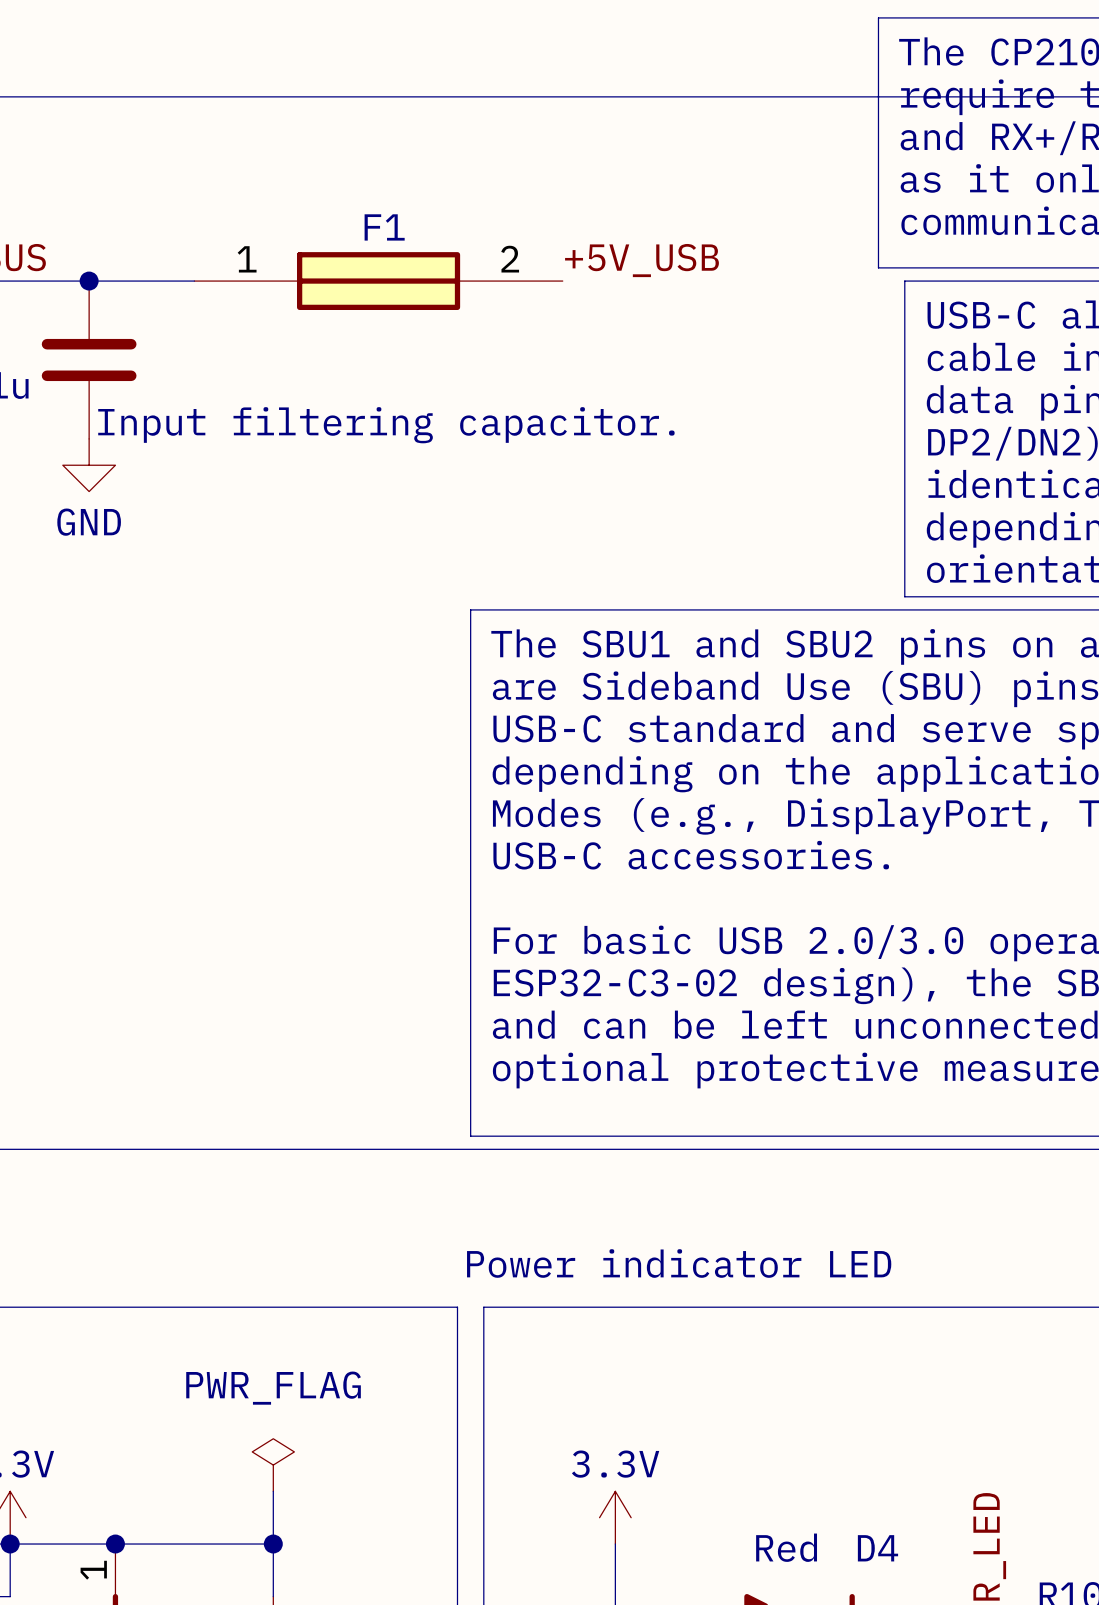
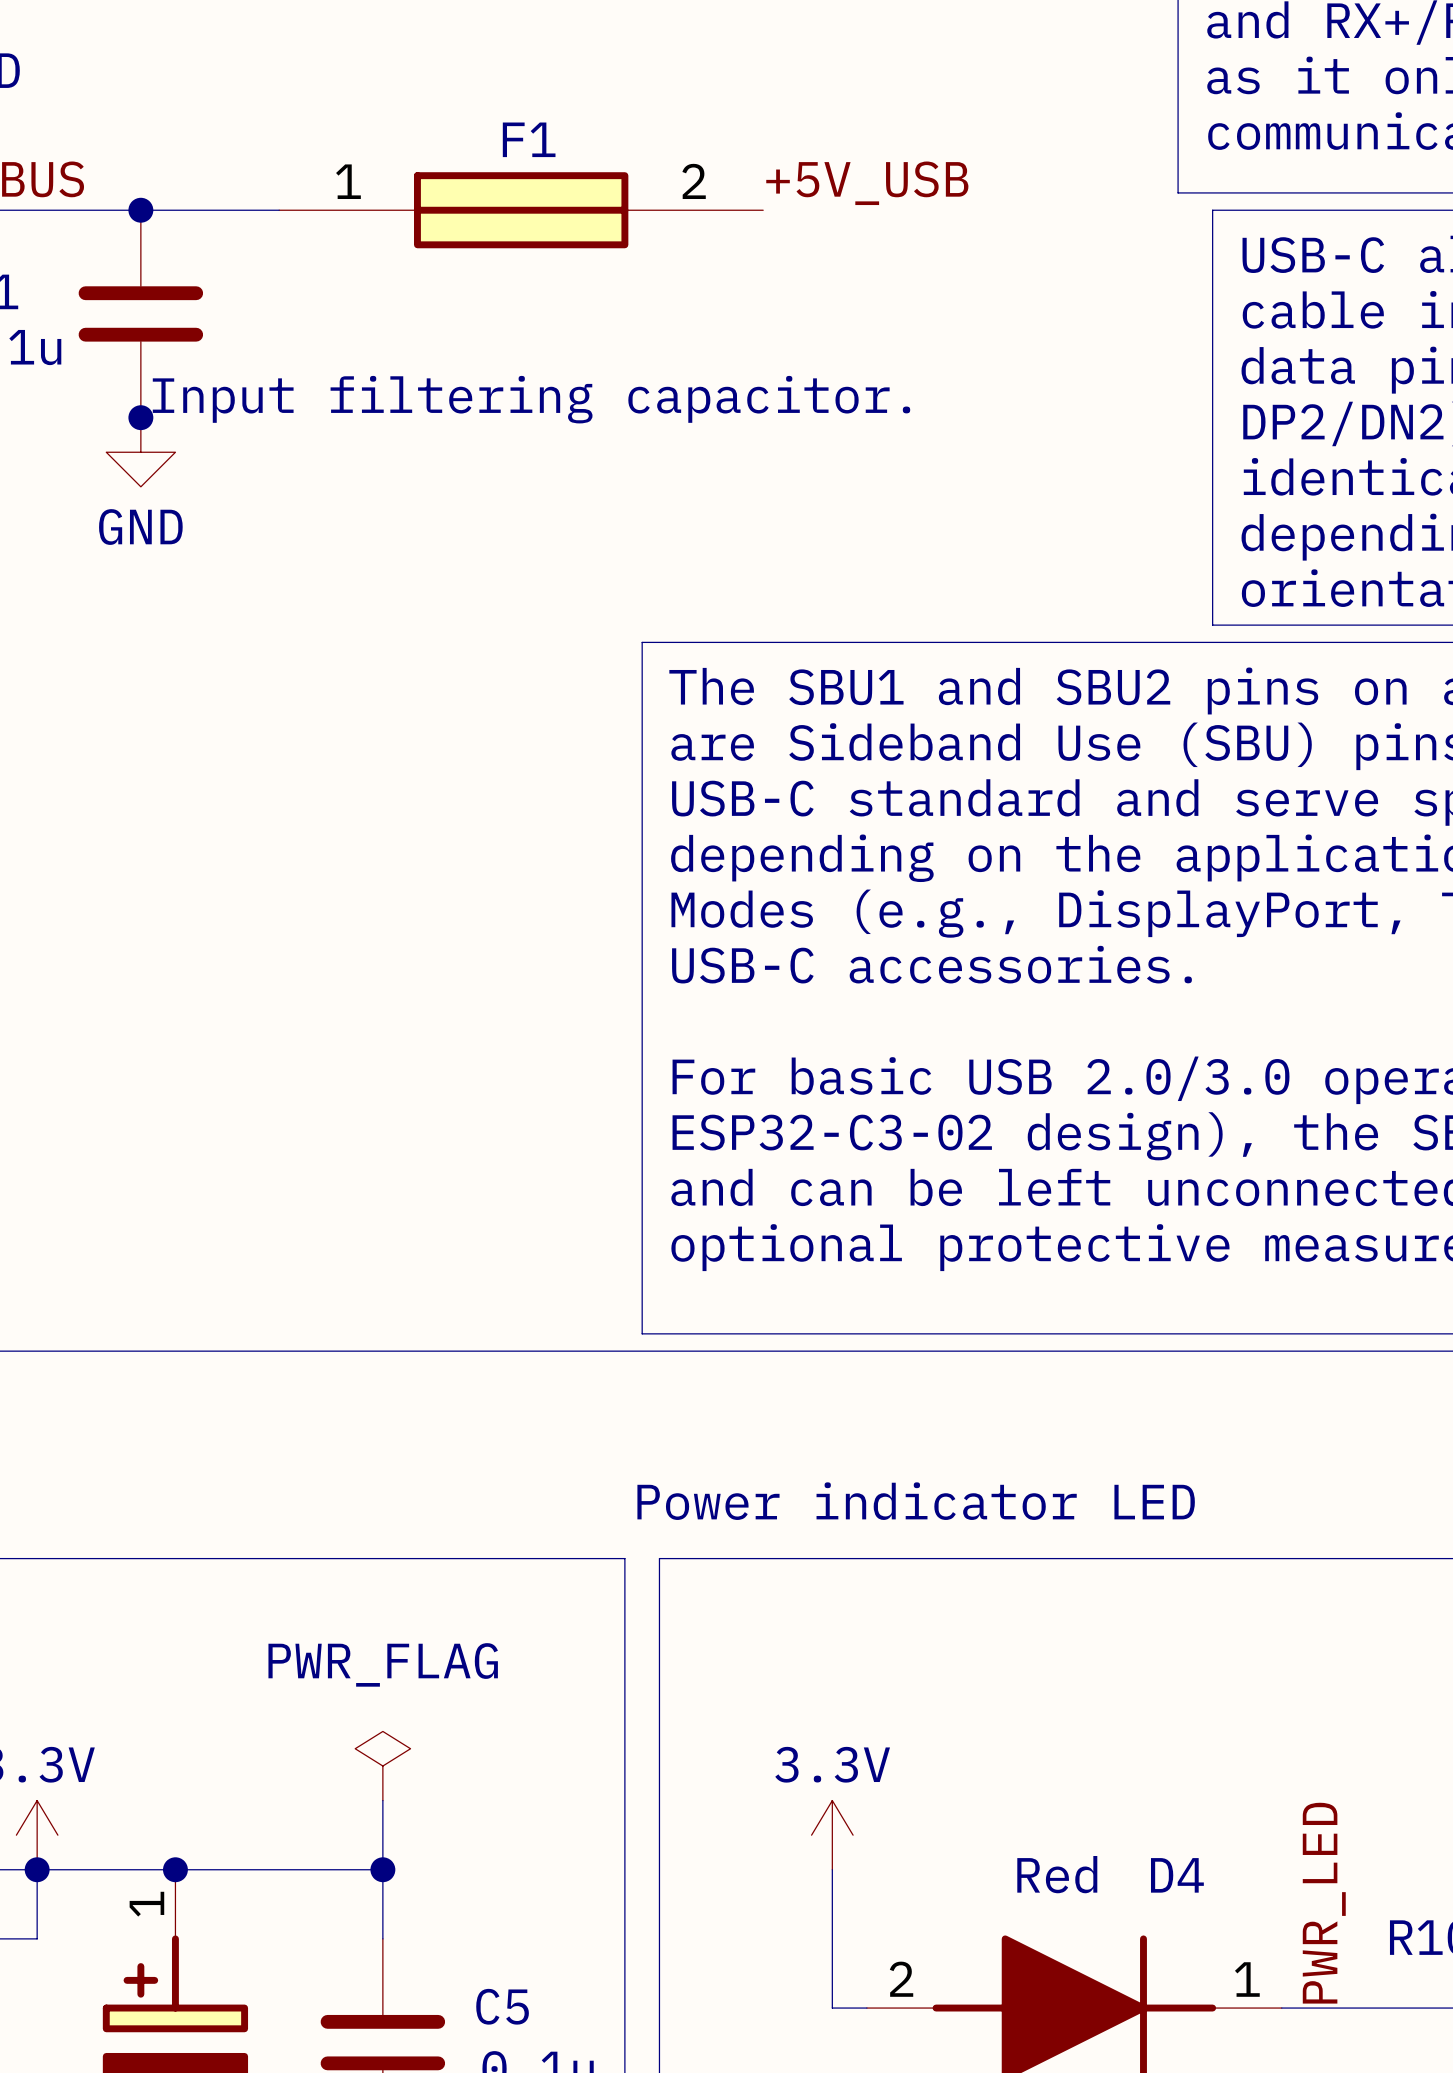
junction: none -> (140, 417)

